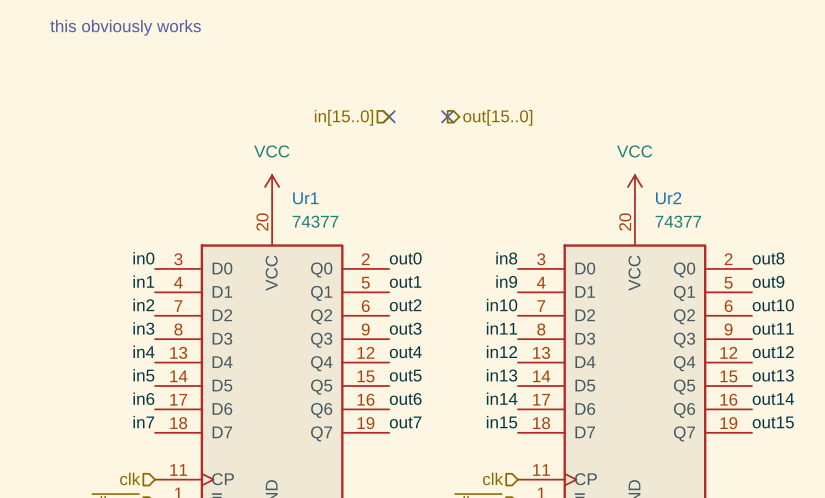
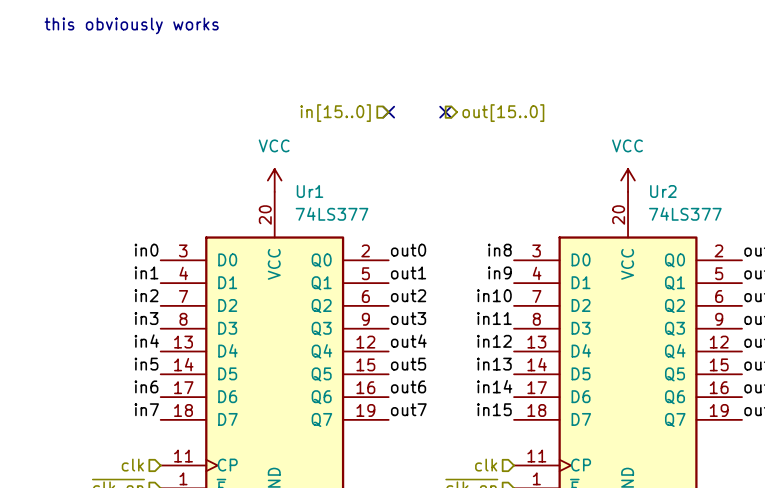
Ur1 value: 74377 (315, 221) -> 74LS377 (332, 214)
Ur2 value: 74377 (678, 221) -> 74LS377 (685, 214)

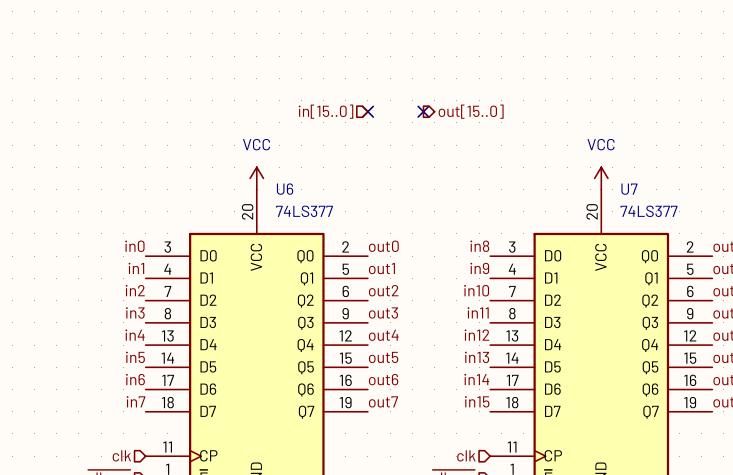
text: this obviously works (131, 25) -> none
Ur1 name: Ur1 (310, 191) -> U6 (285, 189)
Ur2 name: Ur2 (663, 191) -> U7 (629, 189)

